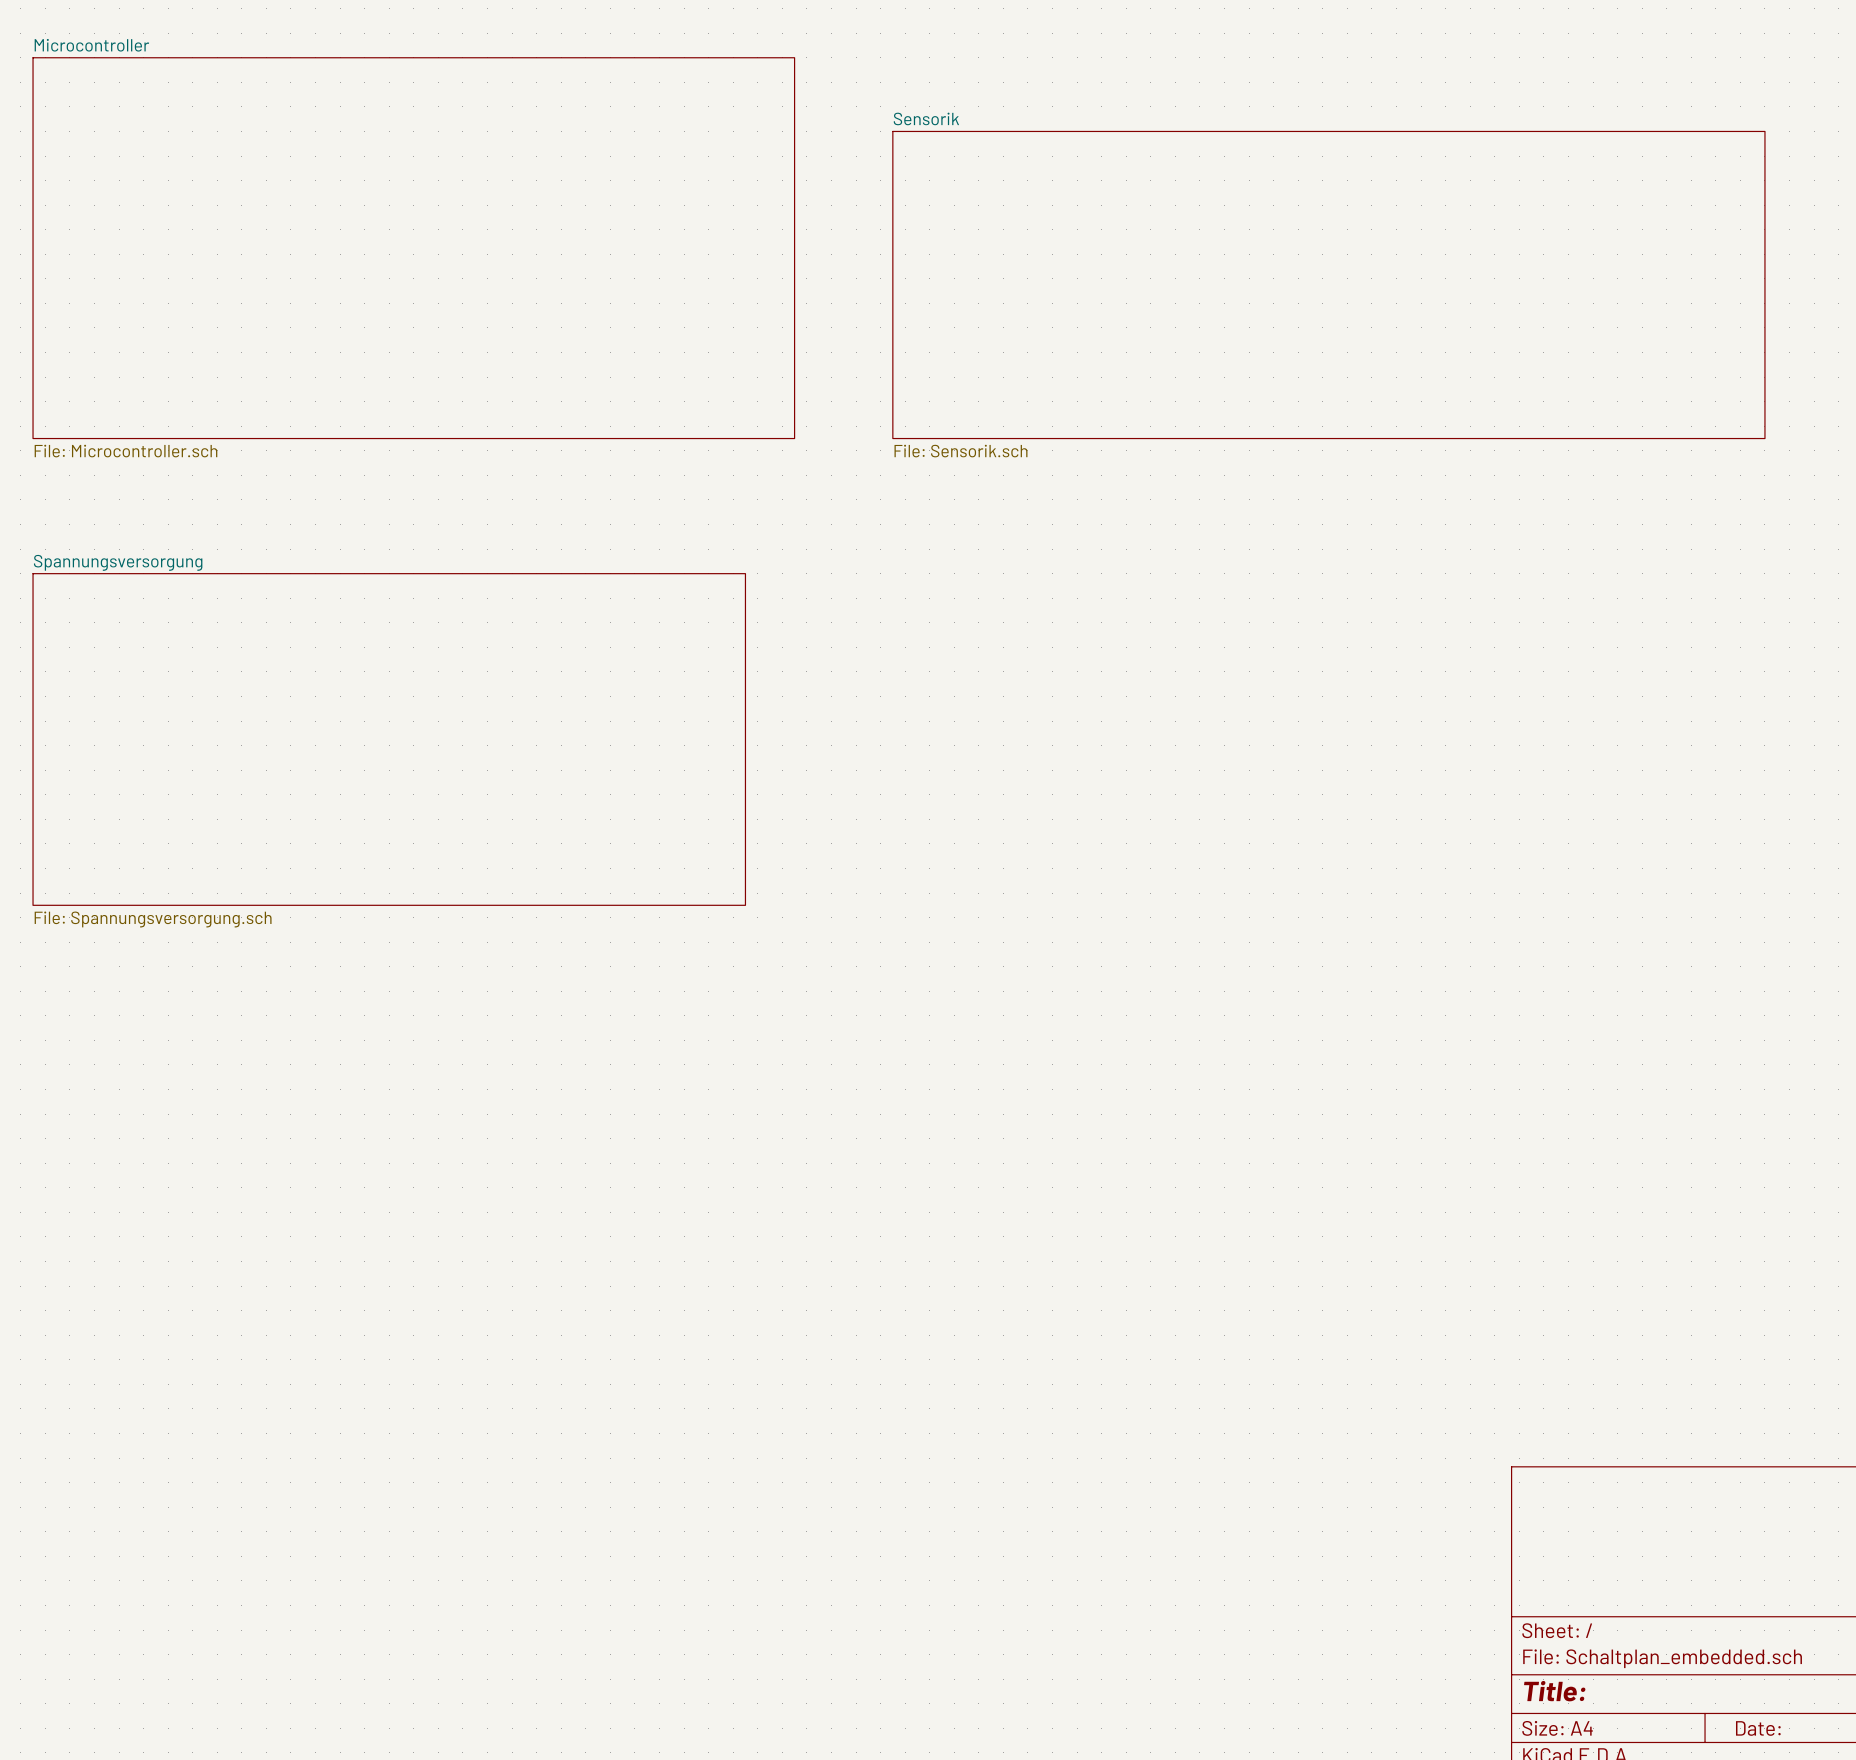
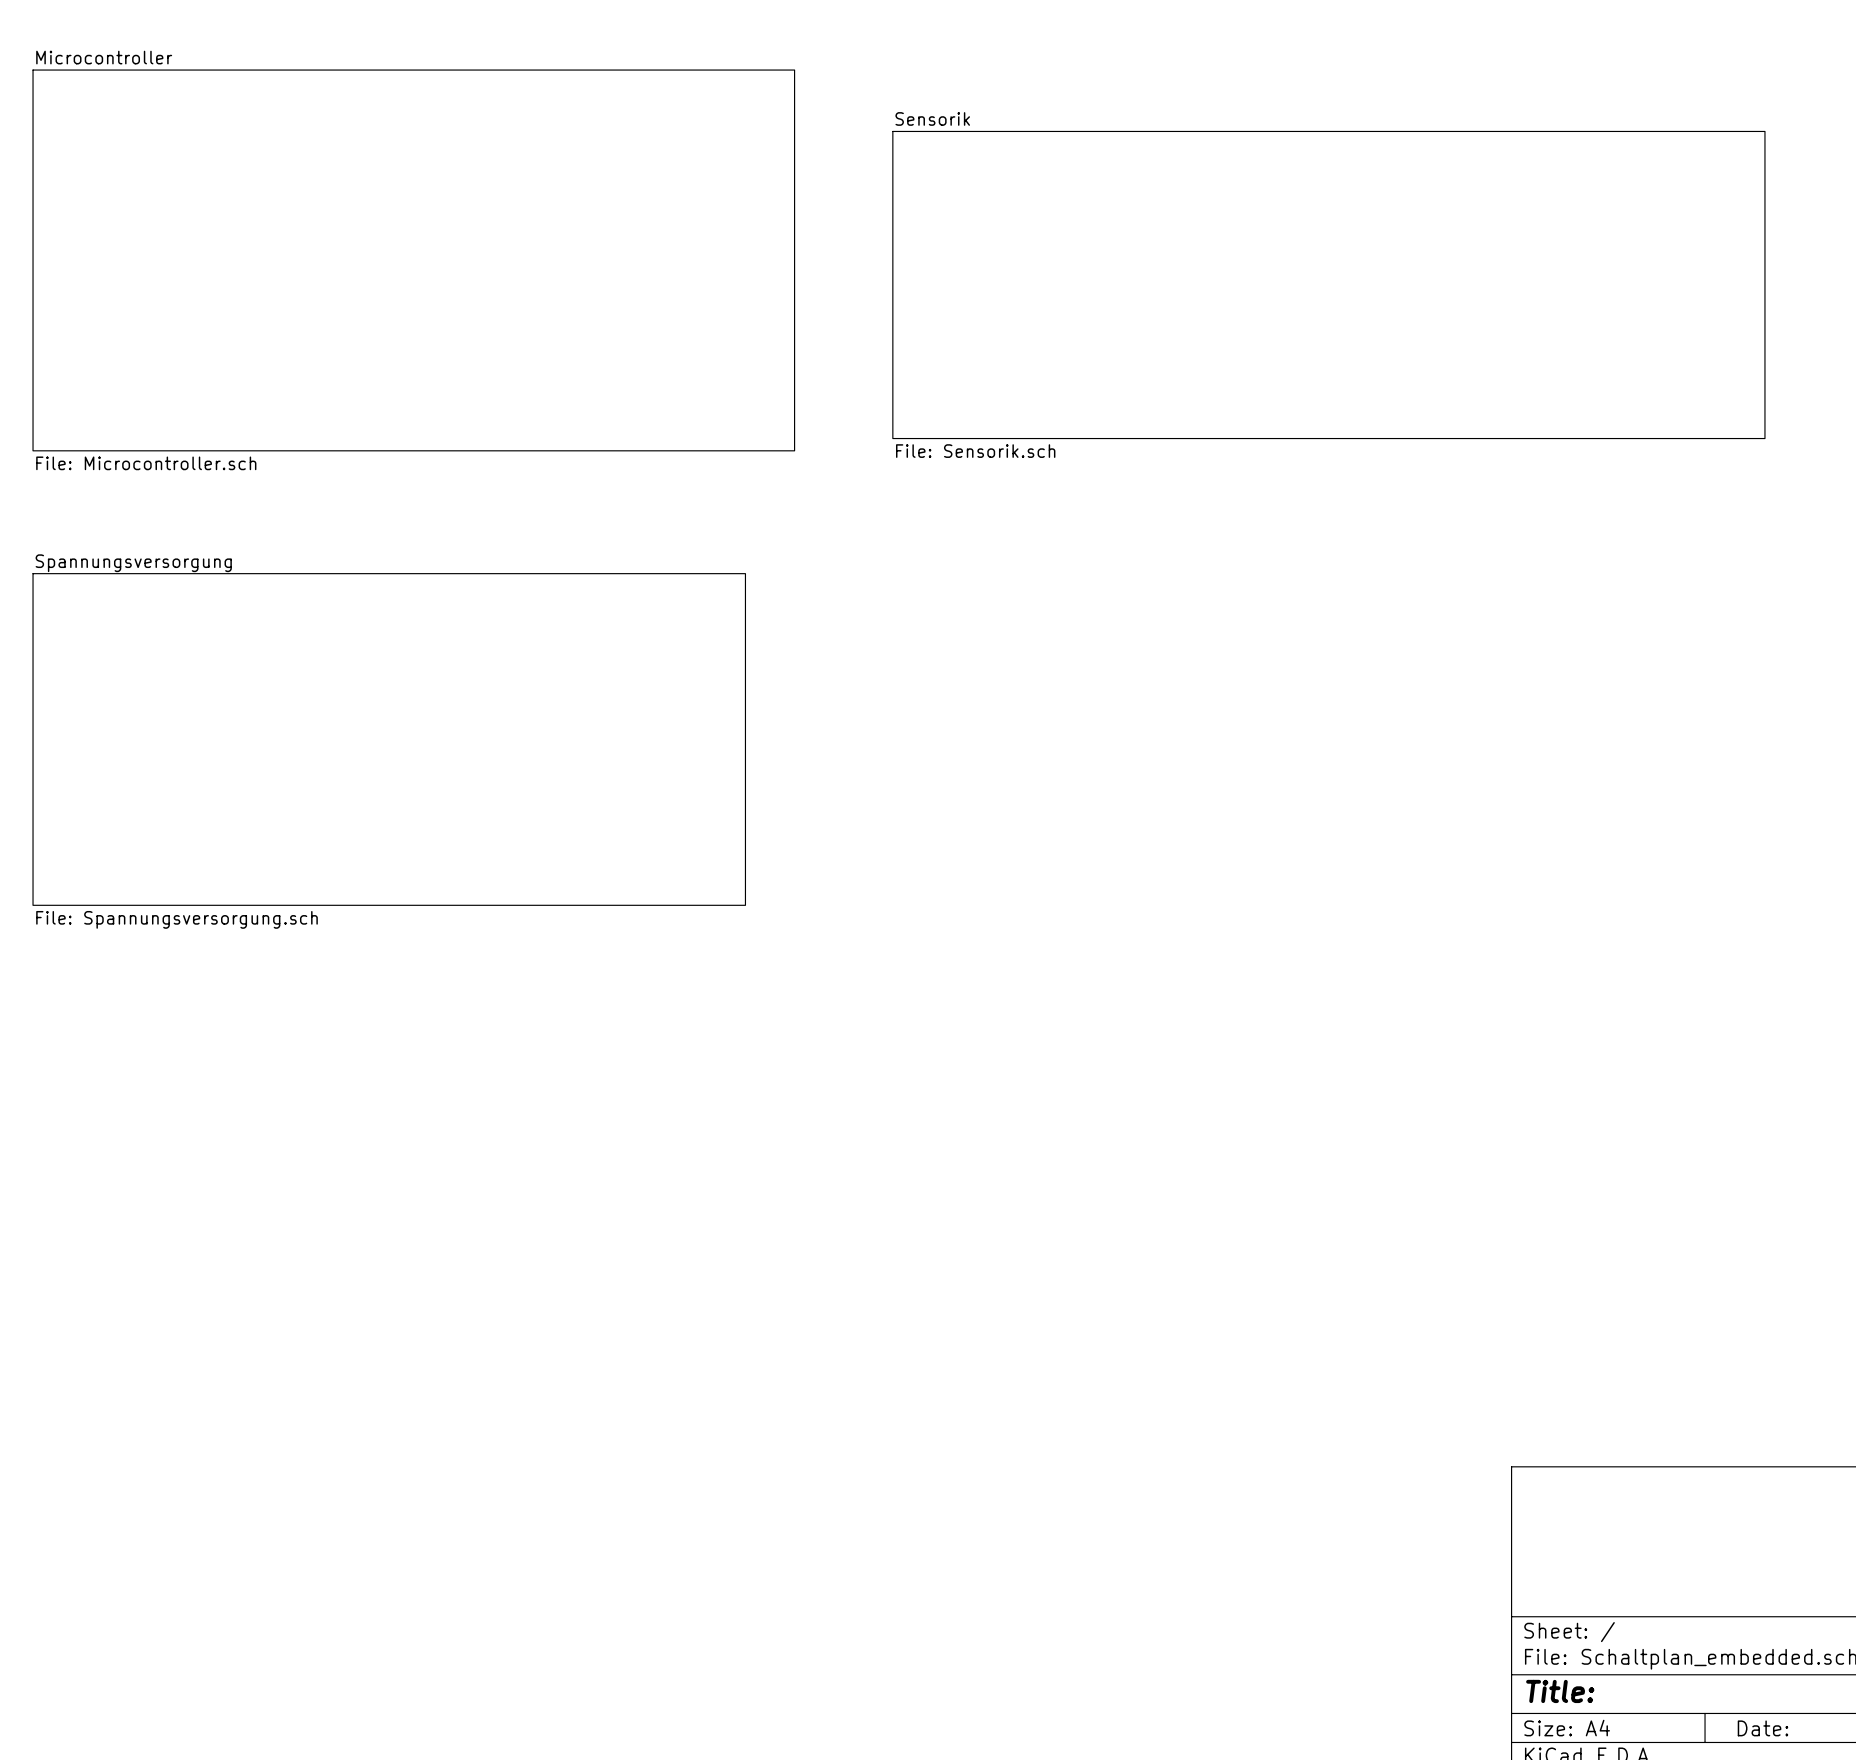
sheet Microcontroller position: (413, 248) -> (413, 260)

